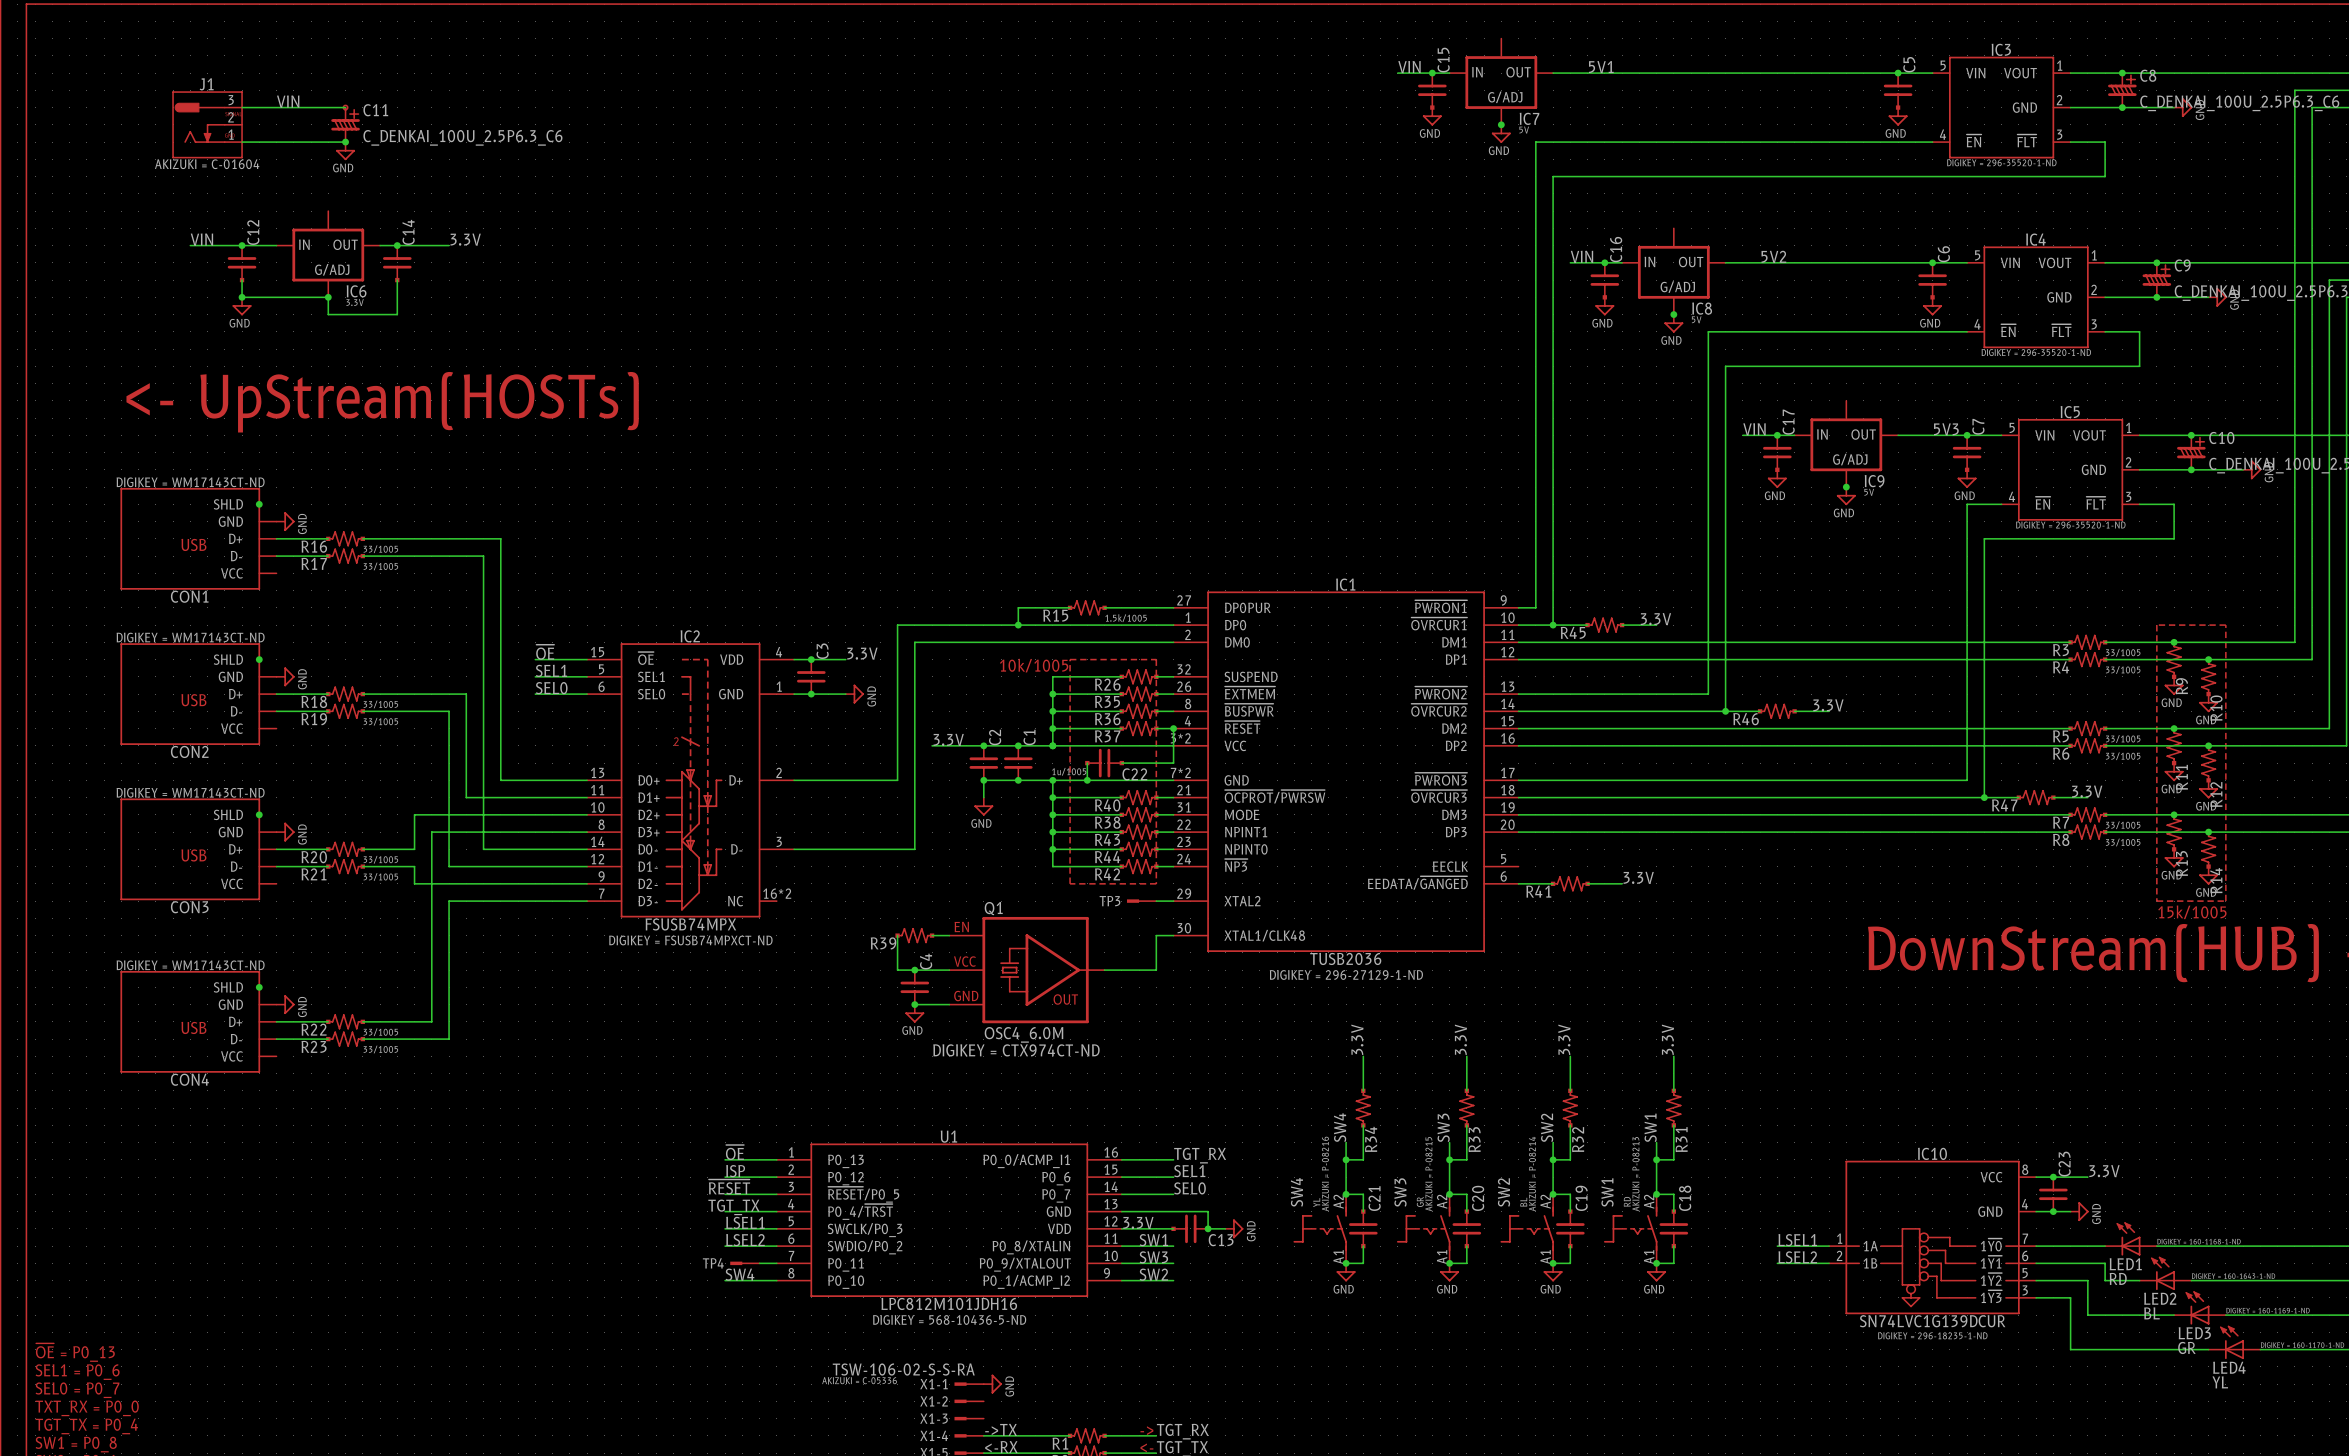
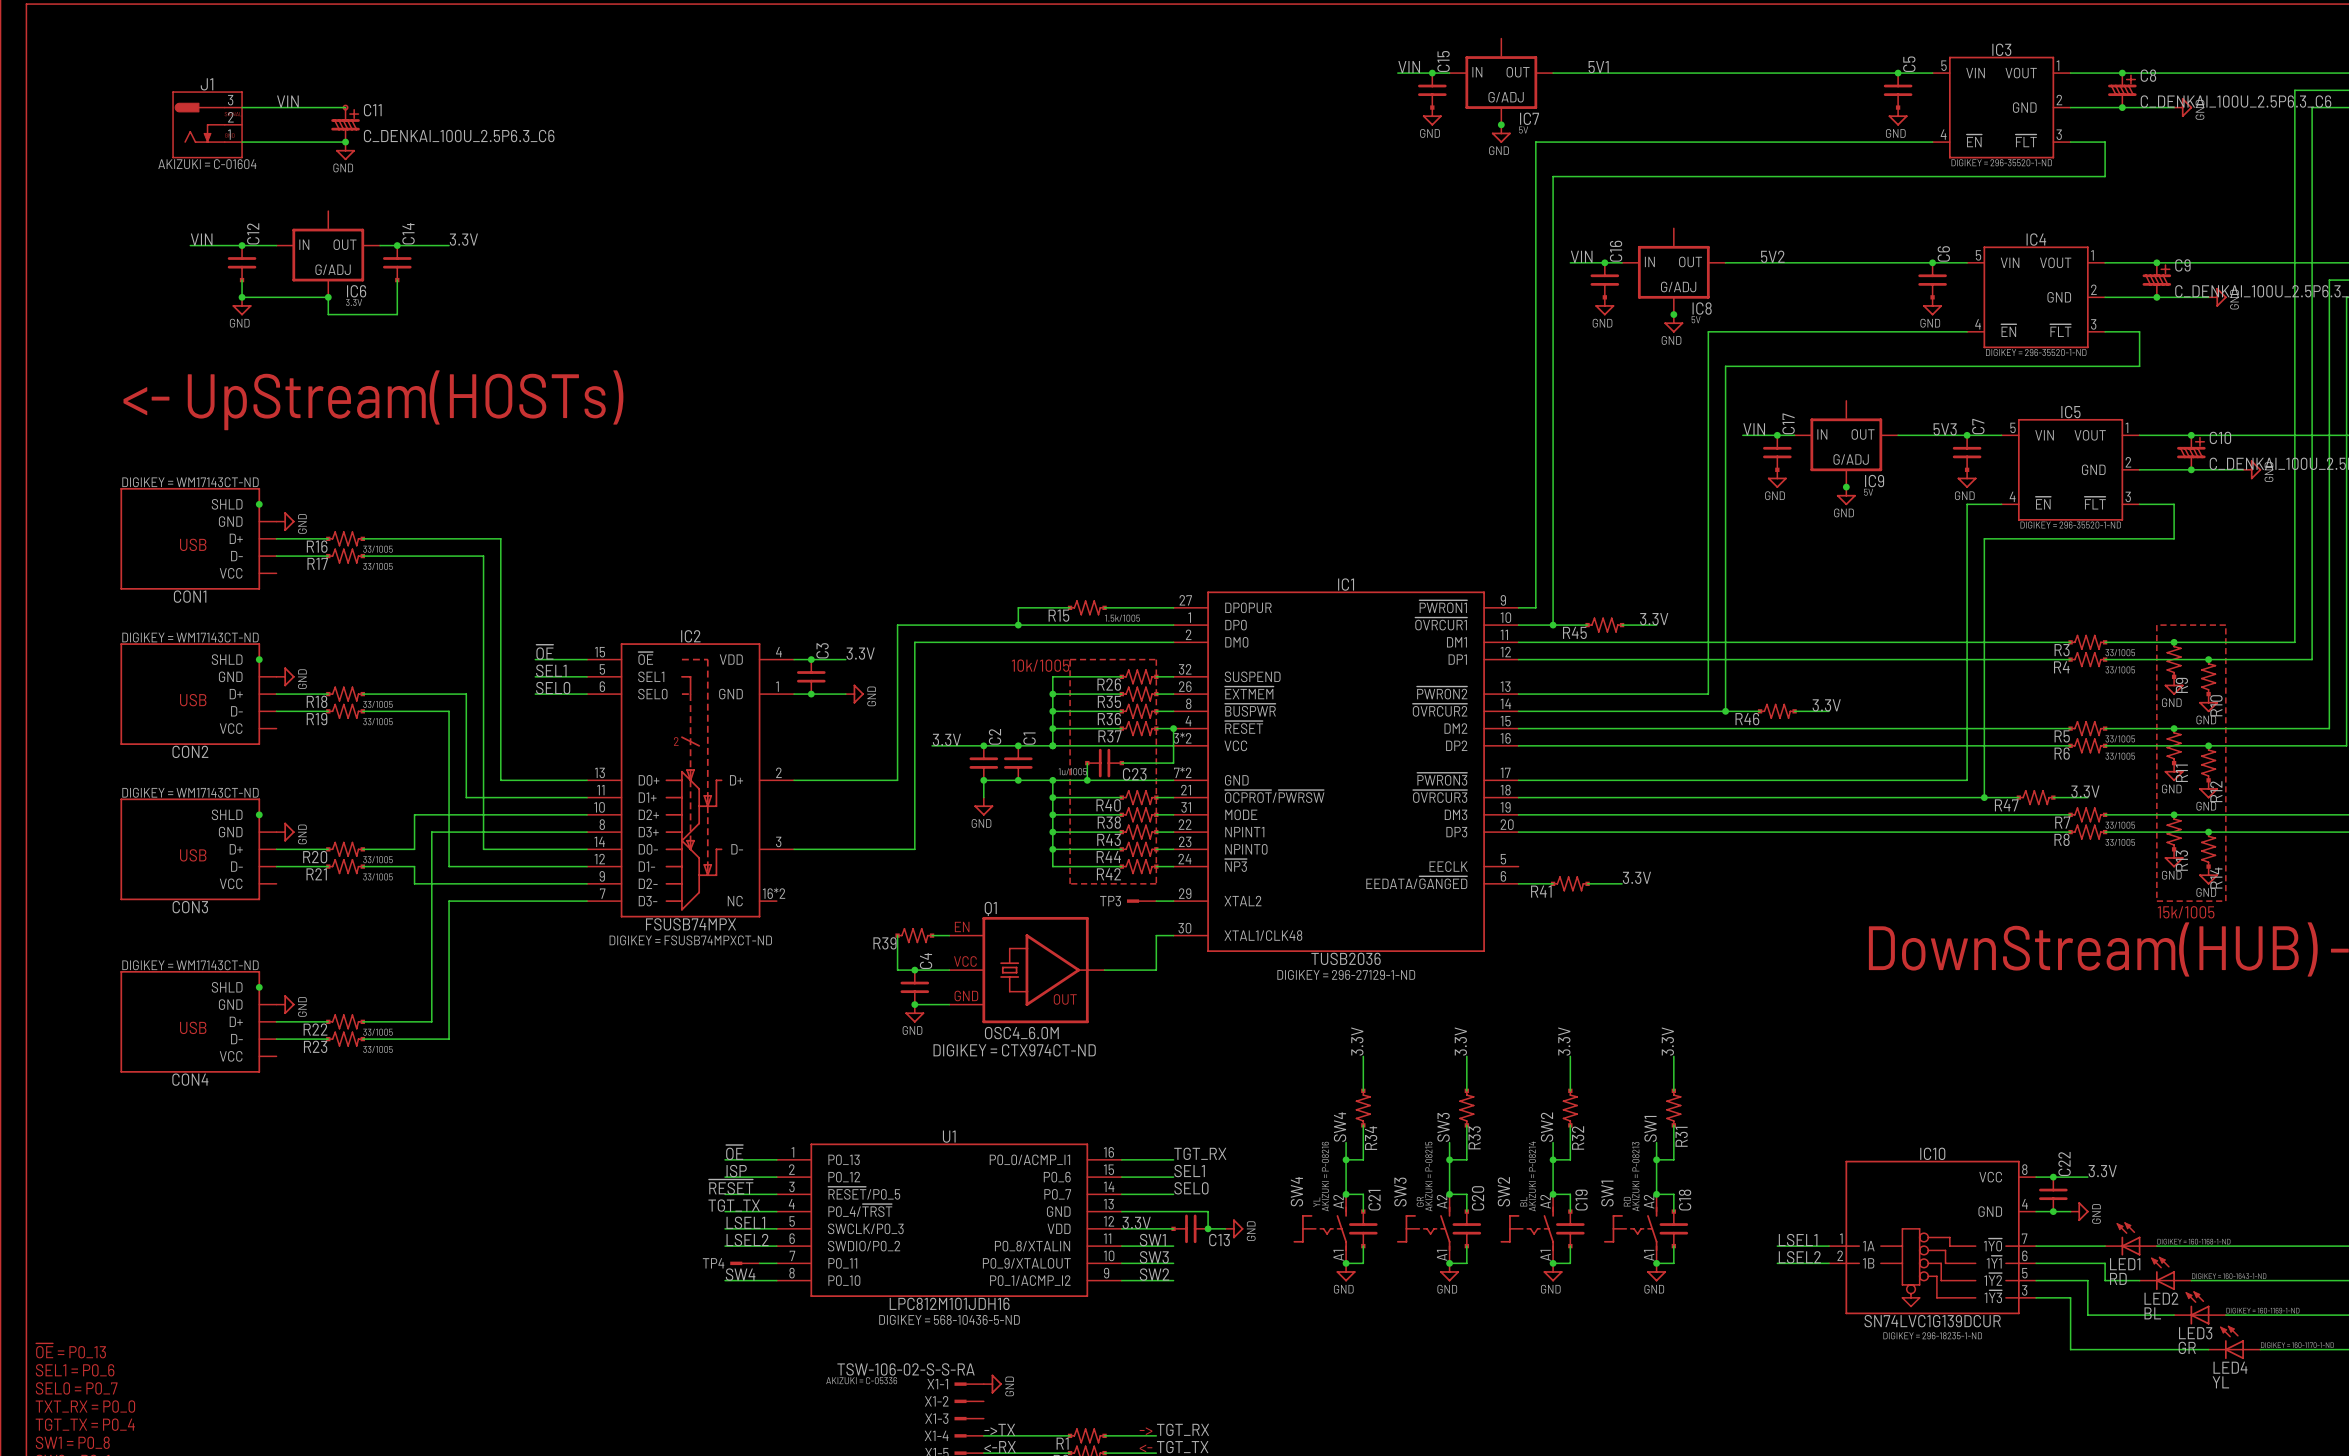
C22 name: C22 (1134, 774) -> C23 (1134, 774)
C23 name: C23 (2064, 1164) -> C22 (2064, 1163)

